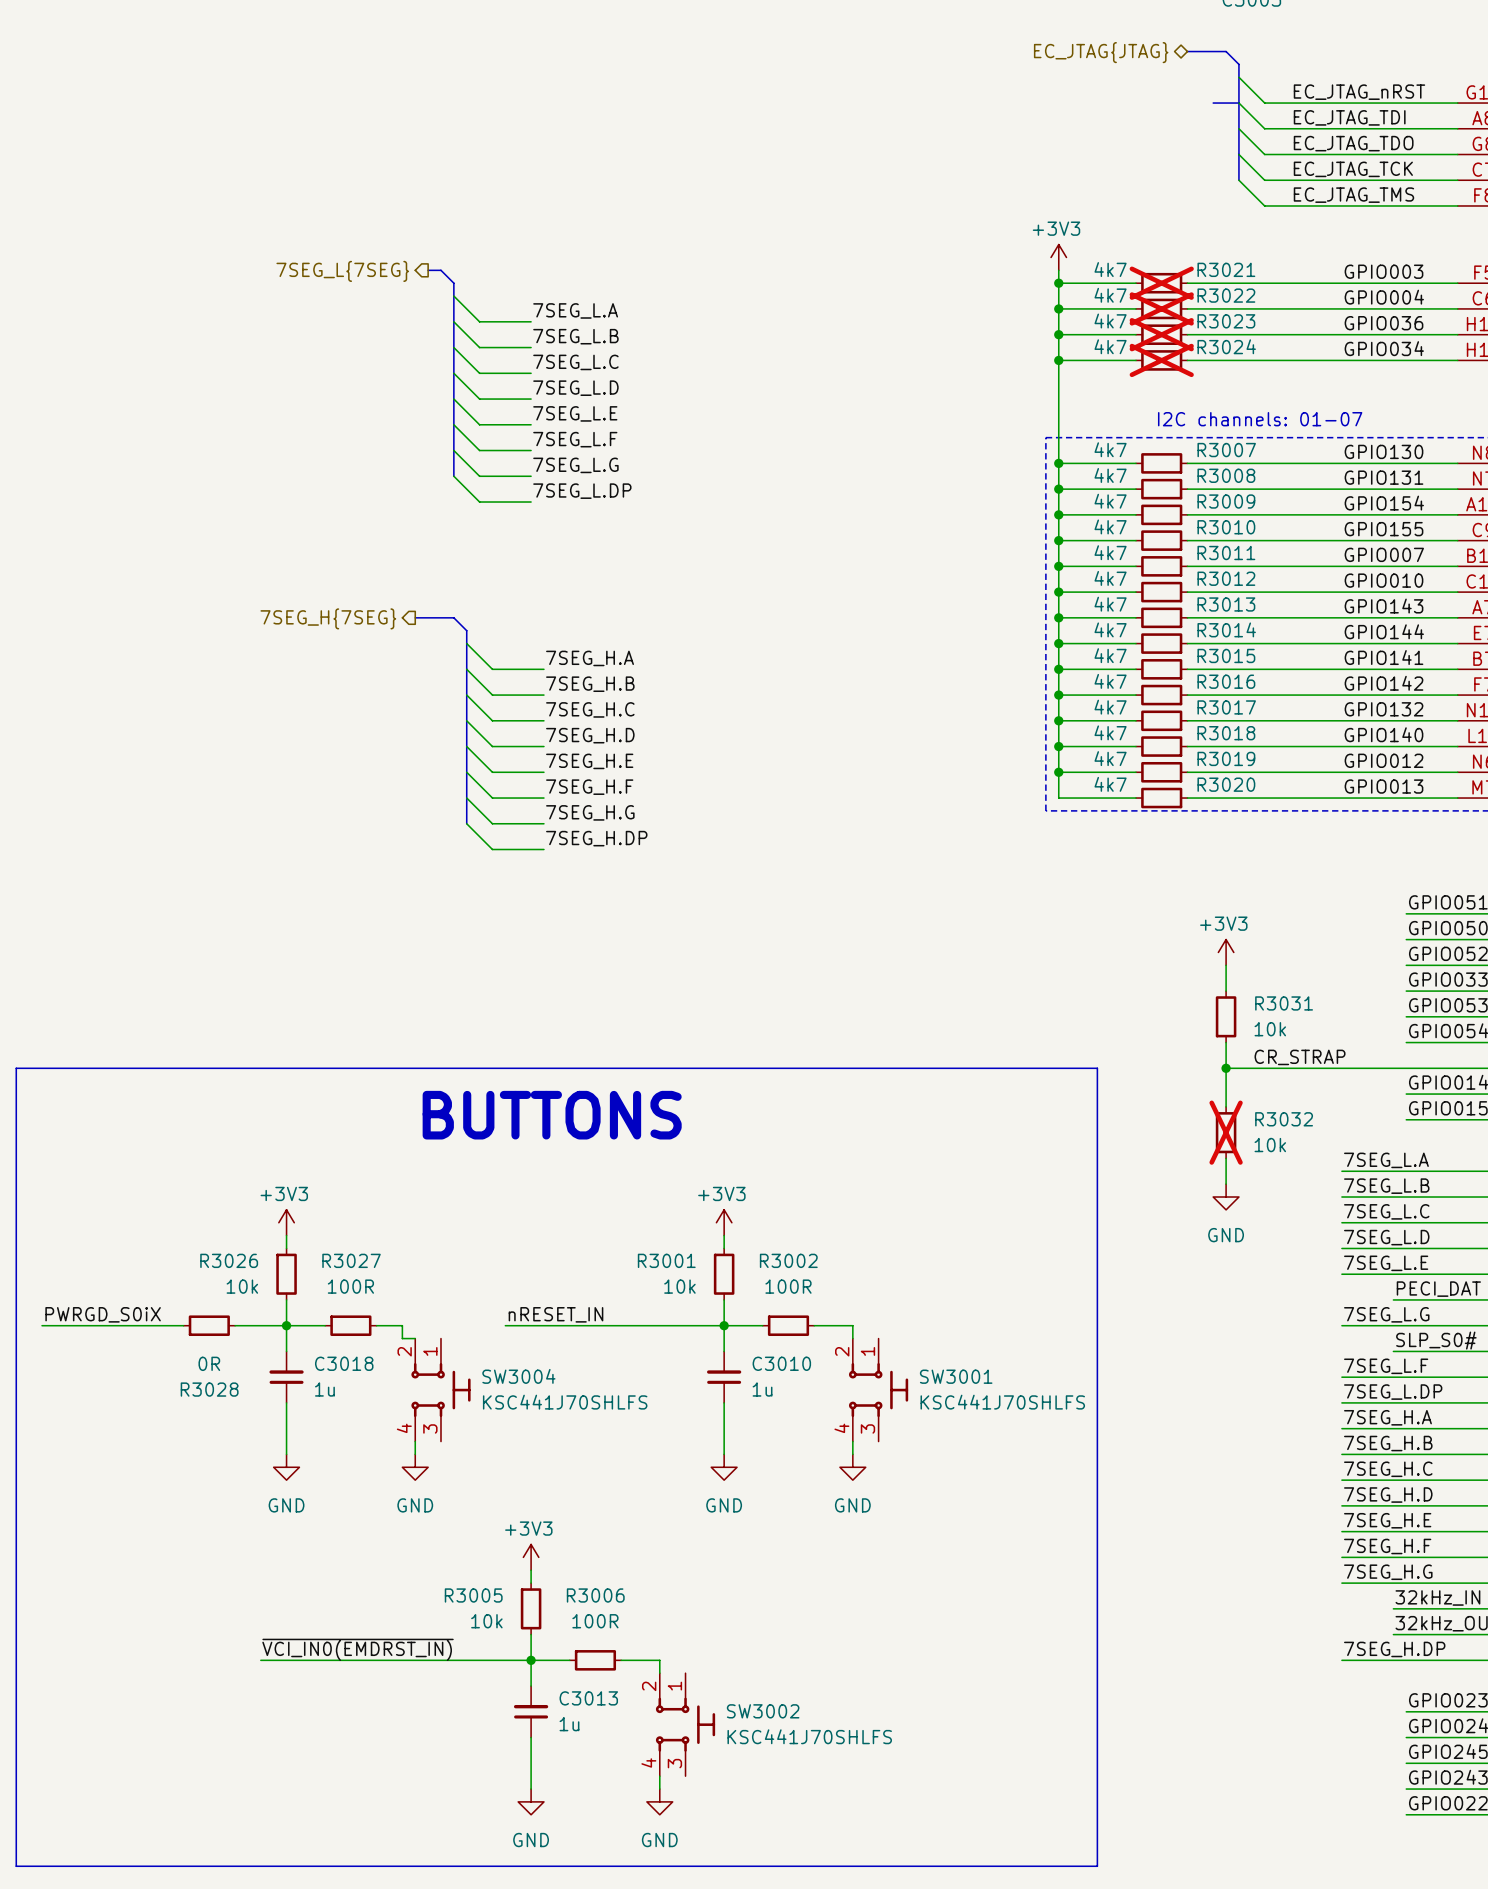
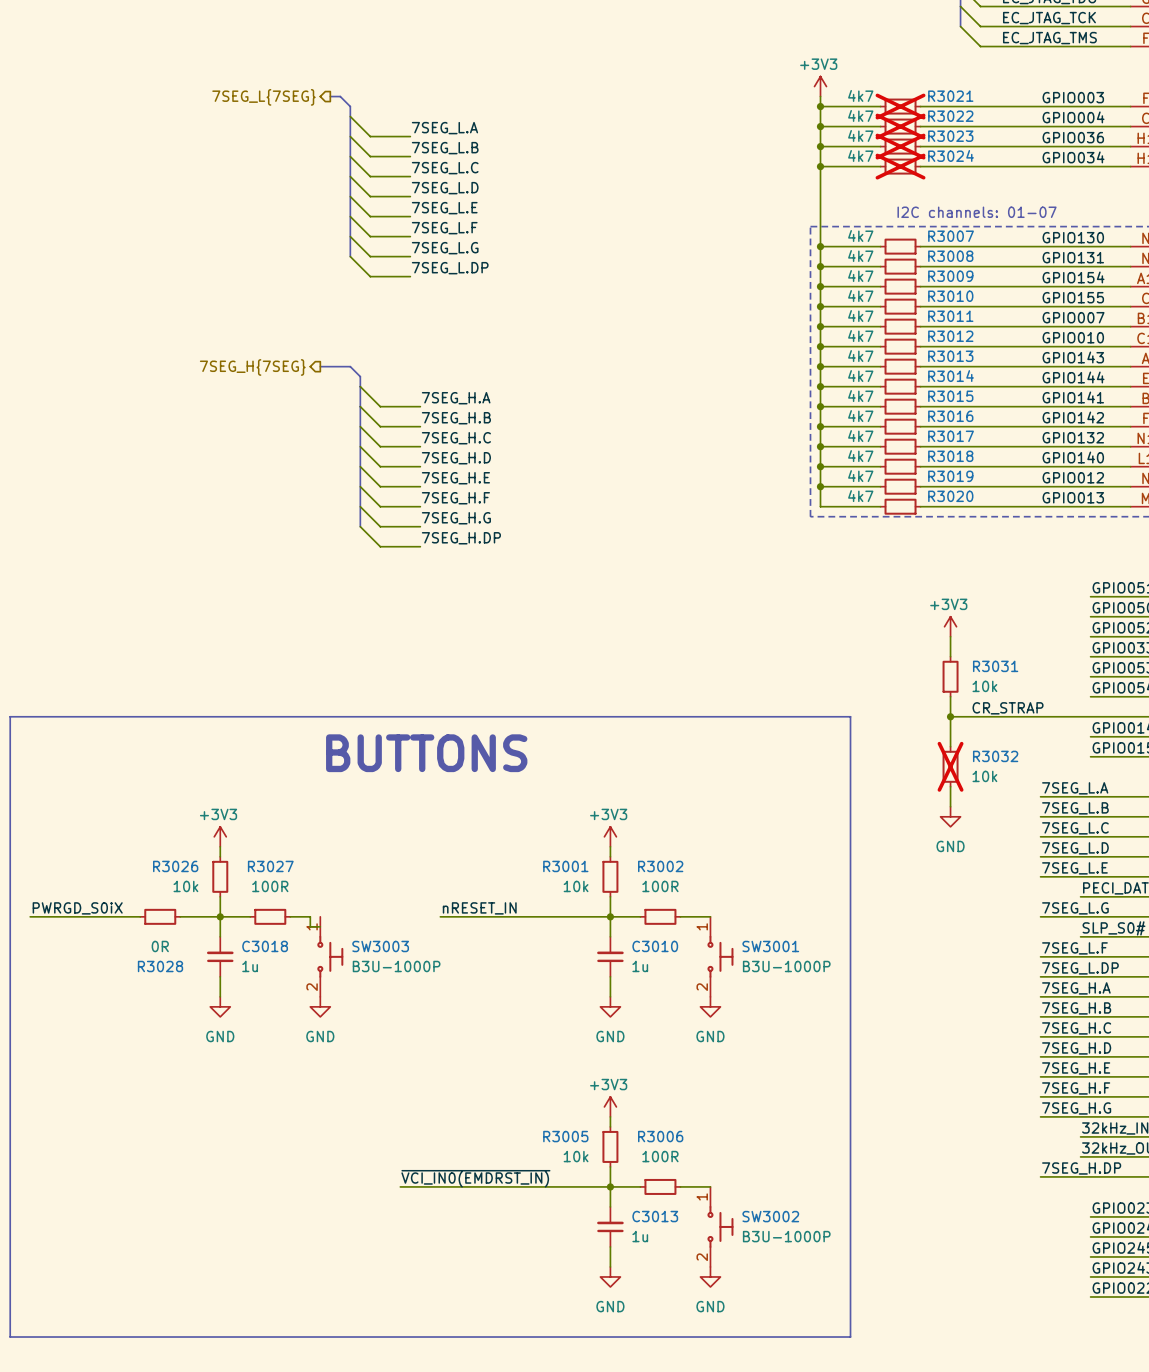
power symbol position: +3V3 (724, 1222) -> +3V3 (610, 836)
wire: (724, 1235) (724, 1248) -> (610, 846) (610, 856)
R3001 position: (724, 1274) -> (610, 876)
wire: (724, 1299) (724, 1351) -> (610, 896) (610, 936)
label position: nRESET_IN (556, 1314) -> nRESET_IN (479, 908)
wire: (505, 1325) (569, 1325) -> none
junction: (724, 1325) -> none
wire: none -> (590, 916) (630, 916)
junction: none -> (610, 916)
R3002 position: (788, 1325) -> (660, 916)
wire: (827, 1325) (852, 1325) (852, 1338) -> none
wire: none -> (680, 916) (710, 916)
SW3001 symbol: [848, 1338, 909, 1442] -> [707, 916, 734, 997]
SW3003: none -> (330, 956)
C3010 position: (724, 1377) -> (610, 956)
SW3004: (440, 1390) -> none
wire: (724, 1402) (724, 1454) -> (610, 1166) (610, 1206)
wire: none -> (610, 976) (610, 996)
SW3001 text: KSC441J70SHLFS (1002, 1402) -> B3U-1000P (786, 966)
wire: (415, 1441) (415, 1454) -> none
power symbol: none -> GND (610, 1006)
wire: (852, 1441) (852, 1454) -> (610, 1116) (610, 1126)
power symbol: none -> GND (710, 1006)
power symbol position: GND (286, 1467) -> GND (220, 1006)
power symbol position: GND (415, 1467) -> GND (320, 1006)
power symbol: GND (724, 1467) -> none
power symbol: GND (852, 1467) -> none
power symbol: +3V3 (531, 1557) -> none
wire: (531, 1570) (531, 1583) -> none
power symbol: none -> +3V3 (610, 1106)
R3005 position: (531, 1608) -> (610, 1146)
wire: (531, 1634) (531, 1686) -> none
label: ~{VCI_IN0(EMDRST_IN)} (358, 1649) -> none
wire: (260, 1660) (569, 1660) -> none
junction: (531, 1660) -> none
R3006 position: (595, 1660) -> (660, 1186)
wire: (621, 1660) (659, 1660) (659, 1673) -> none
label: none -> ~{VCI_IN0(EMDRST_IN)} (475, 1178)
wire: none -> (400, 1186) (640, 1186)
SW3002 symbol: [655, 1673, 716, 1777] -> [707, 1186, 734, 1267]
junction: none -> (610, 1186)
wire: none -> (680, 1186) (710, 1186)
C3013 position: (531, 1711) -> (610, 1226)
SW3002 text: KSC441J70SHLFS (809, 1736) -> B3U-1000P (786, 1236)
wire: (531, 1737) (531, 1789) -> none
wire: none -> (610, 1246) (610, 1266)
wire: (659, 1776) (659, 1789) -> none
power symbol: none -> GND (610, 1276)
power symbol: none -> GND (710, 1276)
power symbol: GND (531, 1801) -> none
power symbol: GND (659, 1801) -> none

